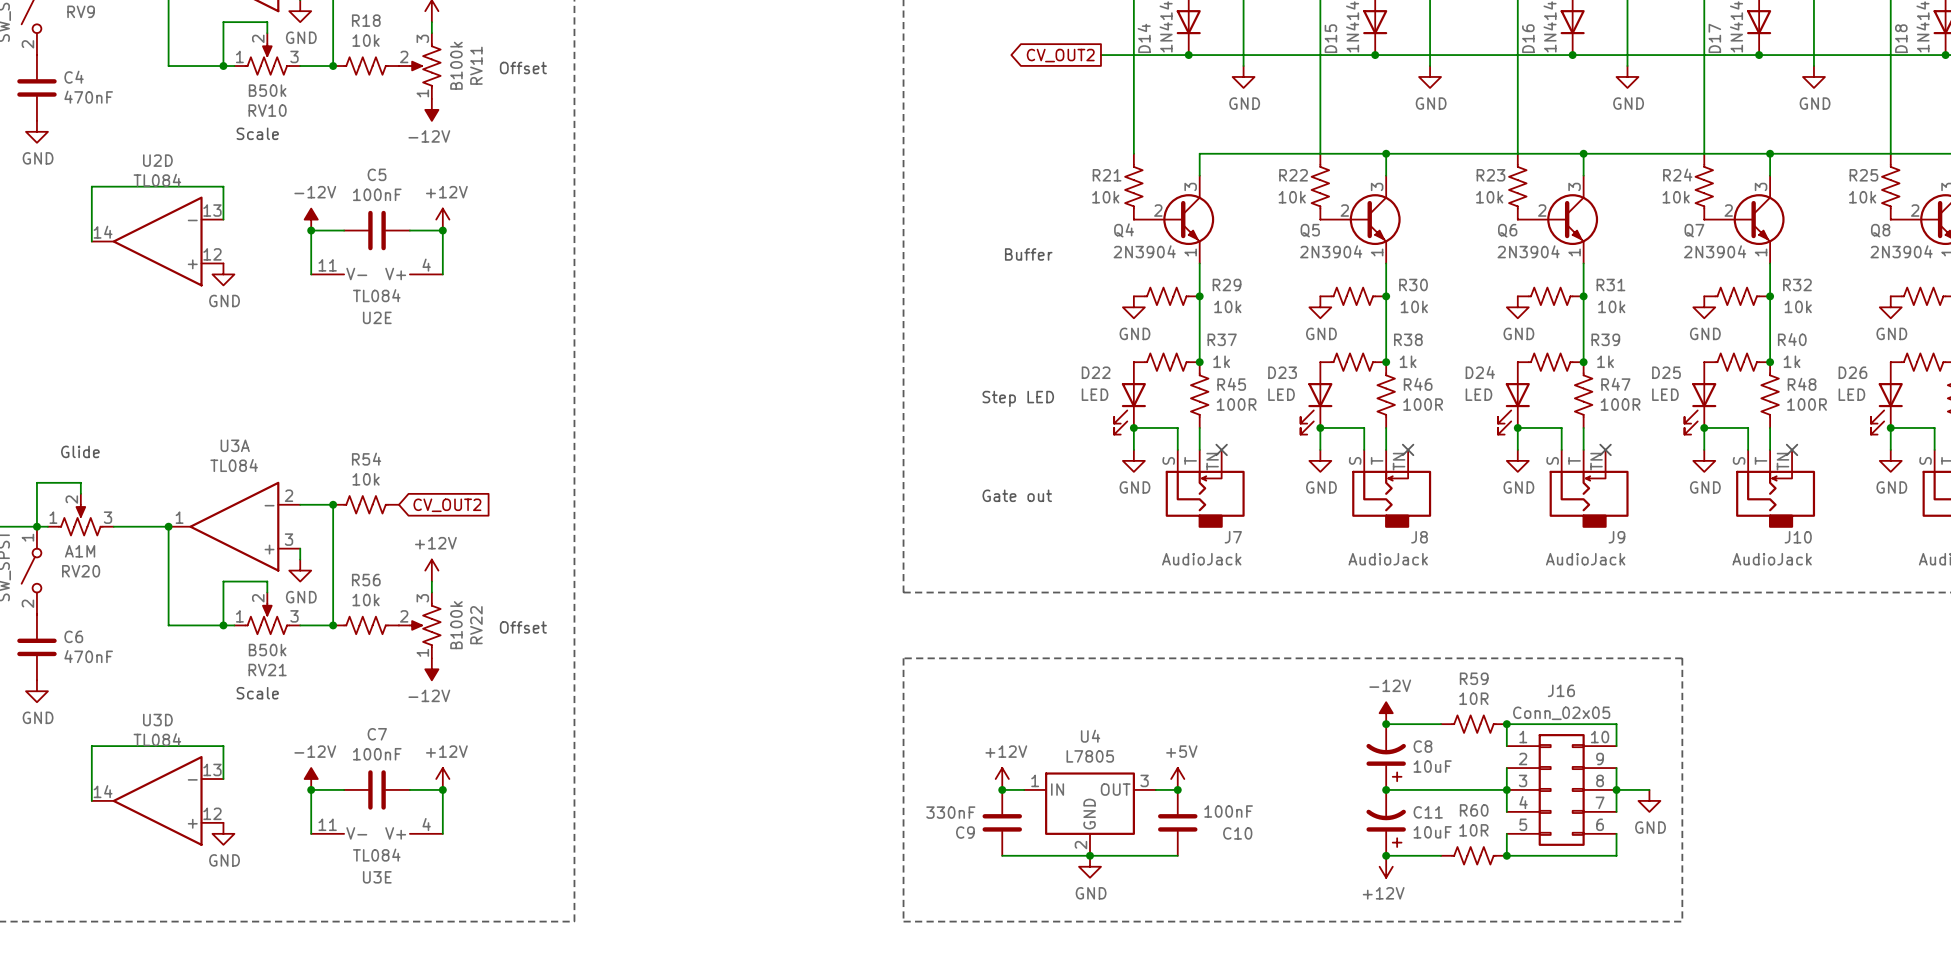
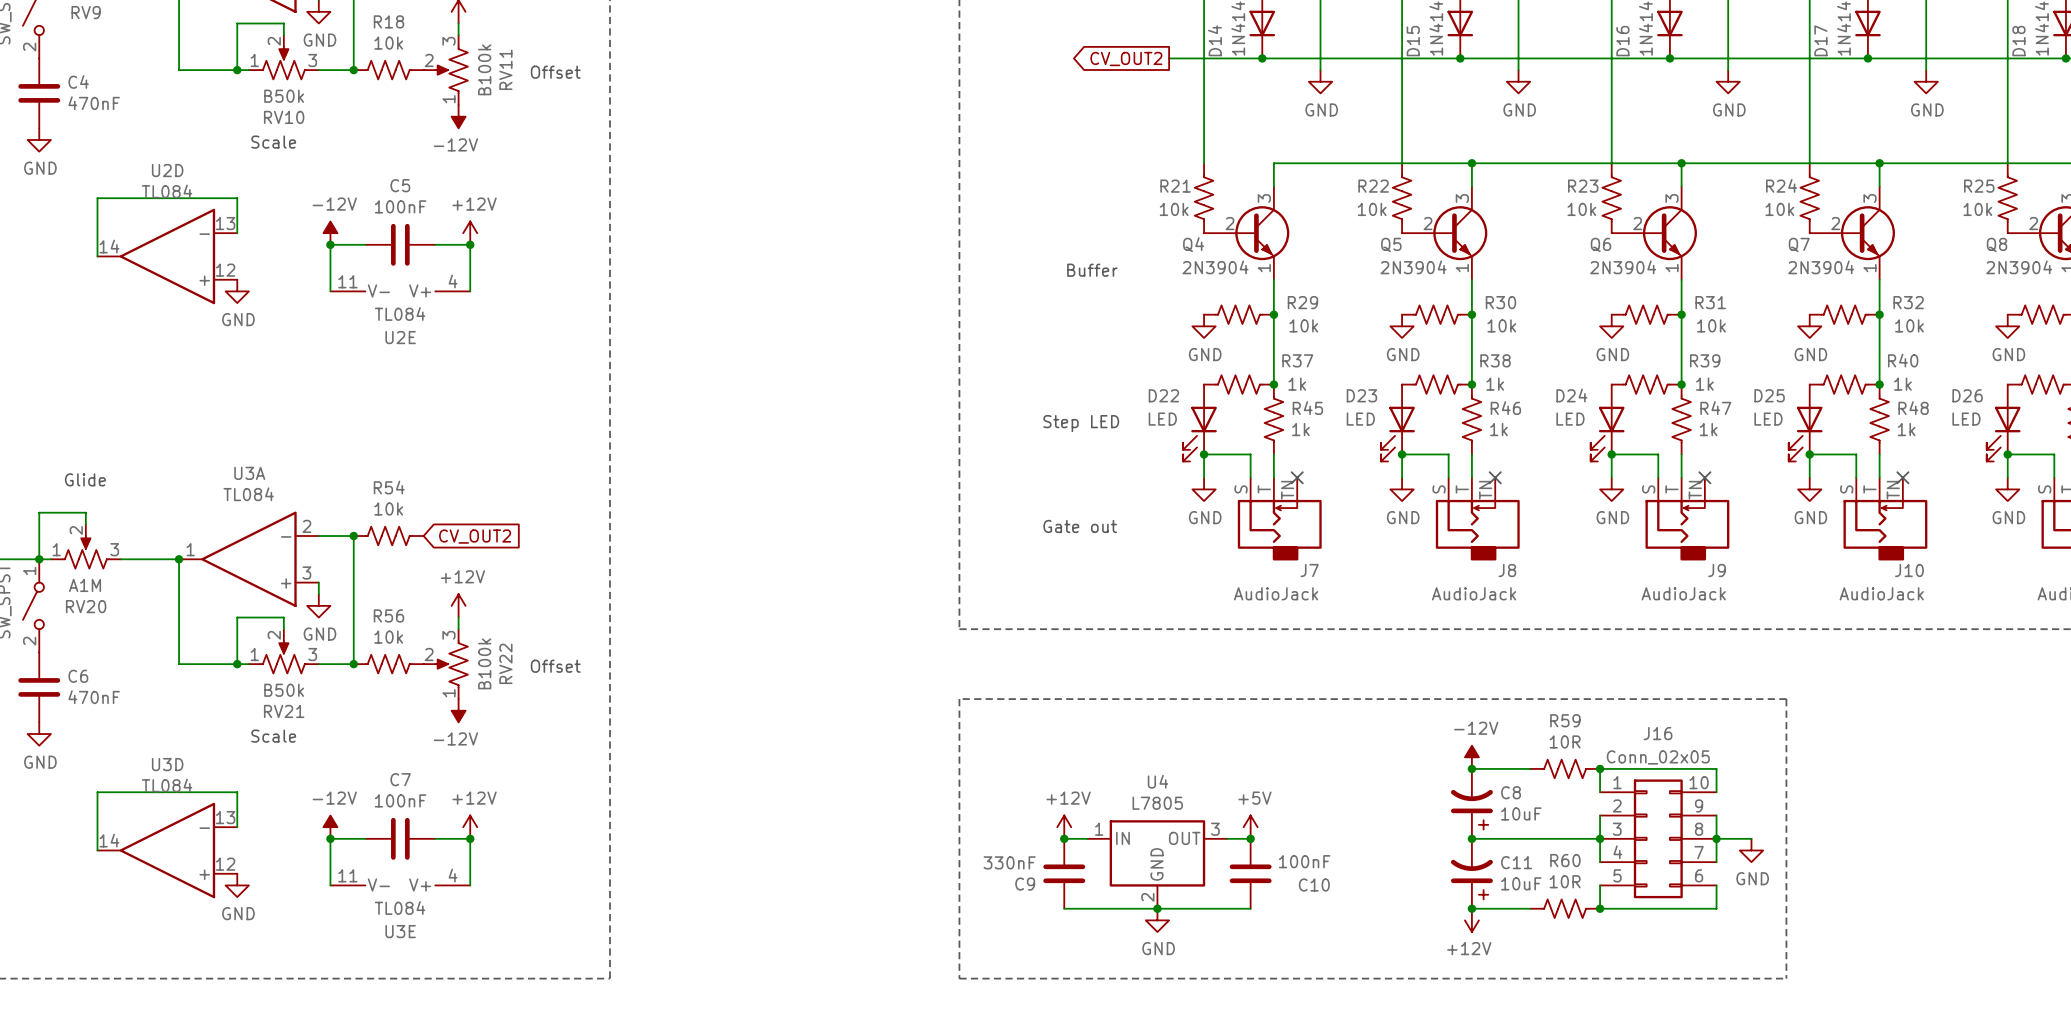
R45 value: 100R (1236, 404) -> 1k (1300, 429)
R46 value: 100R (1423, 404) -> 1k (1498, 429)
R47 value: 100R (1620, 404) -> 1k (1708, 429)
R48 value: 100R (1807, 404) -> 1k (1906, 429)

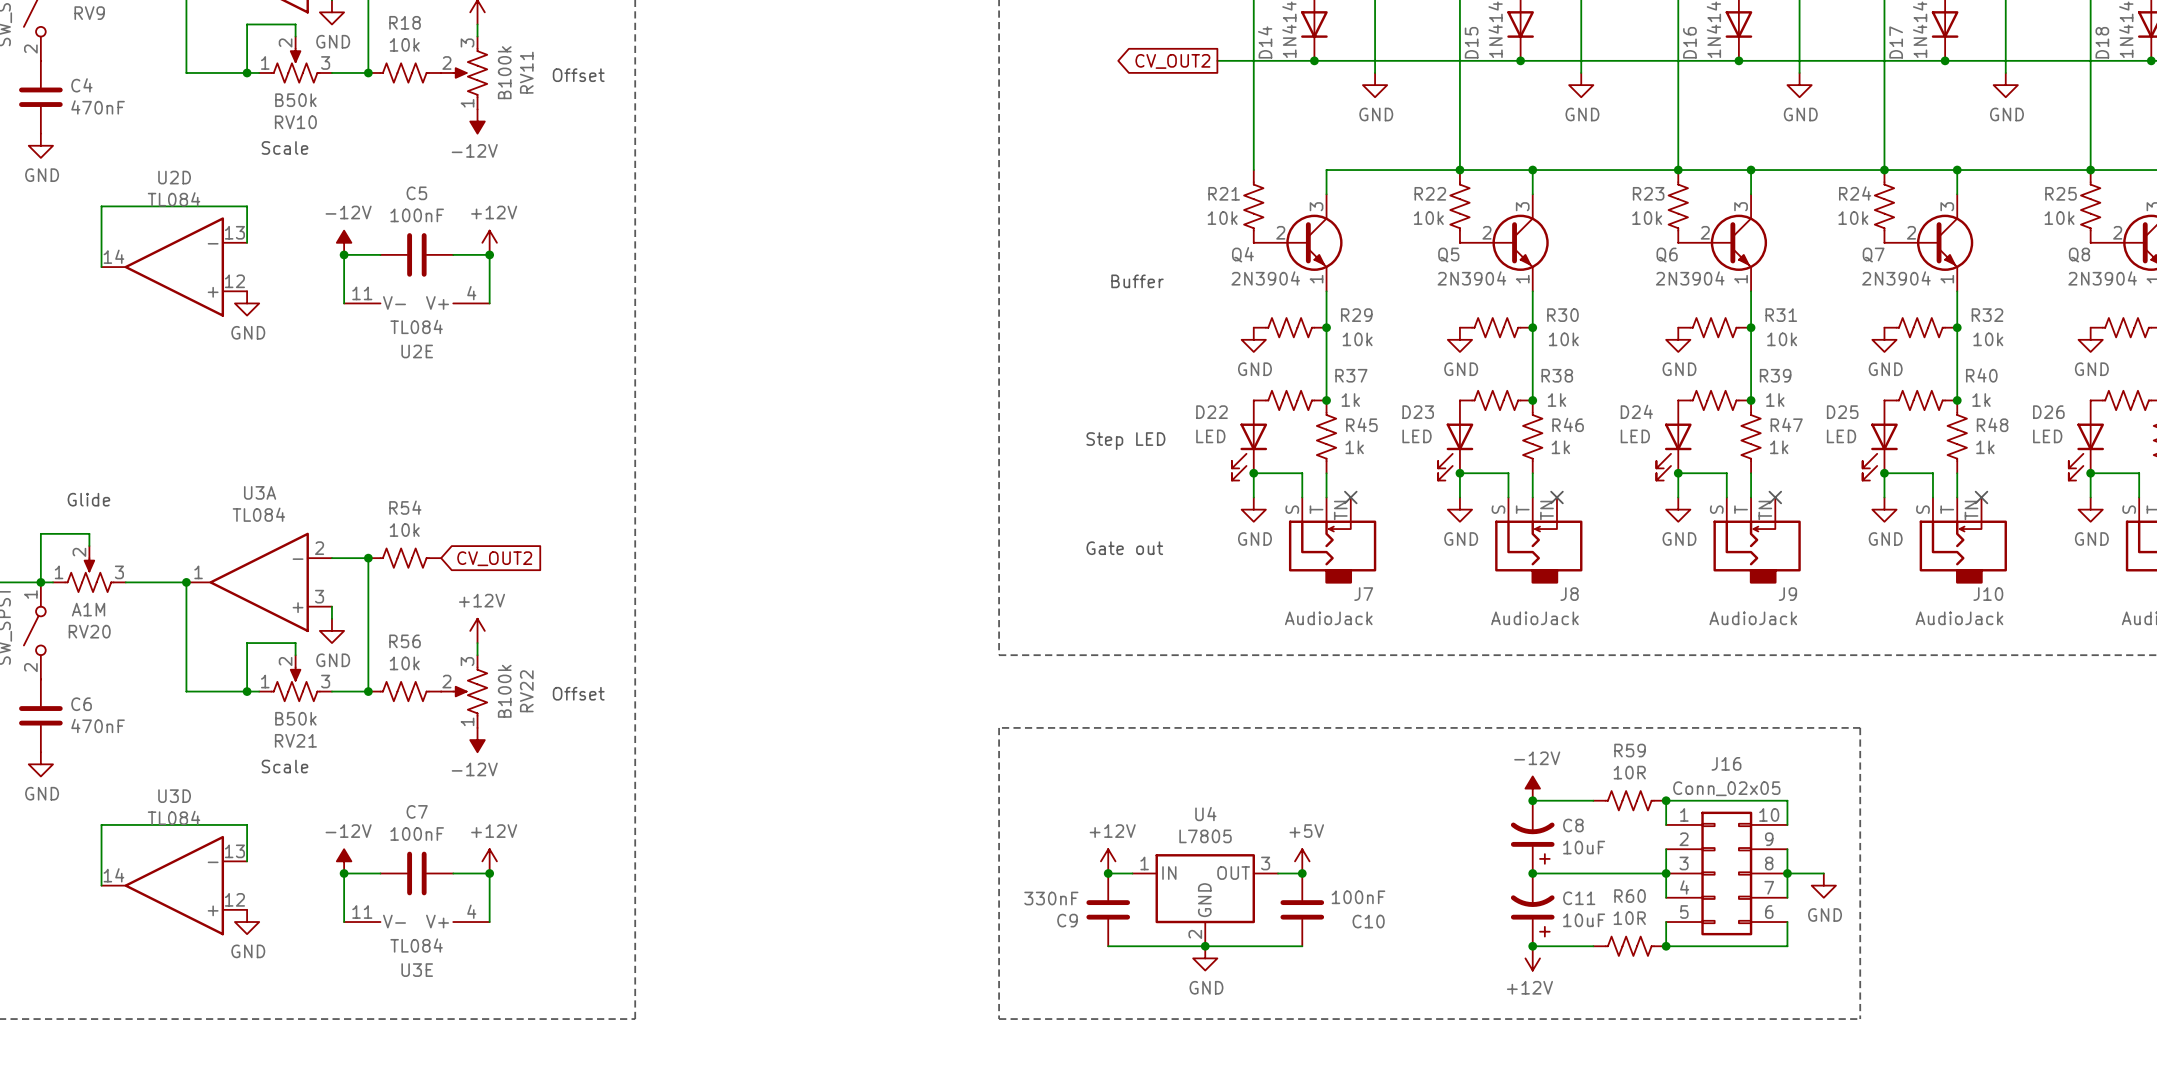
junction: none -> (1459, 170)
junction: none -> (1678, 170)
junction: none -> (1884, 170)
junction: none -> (2090, 170)

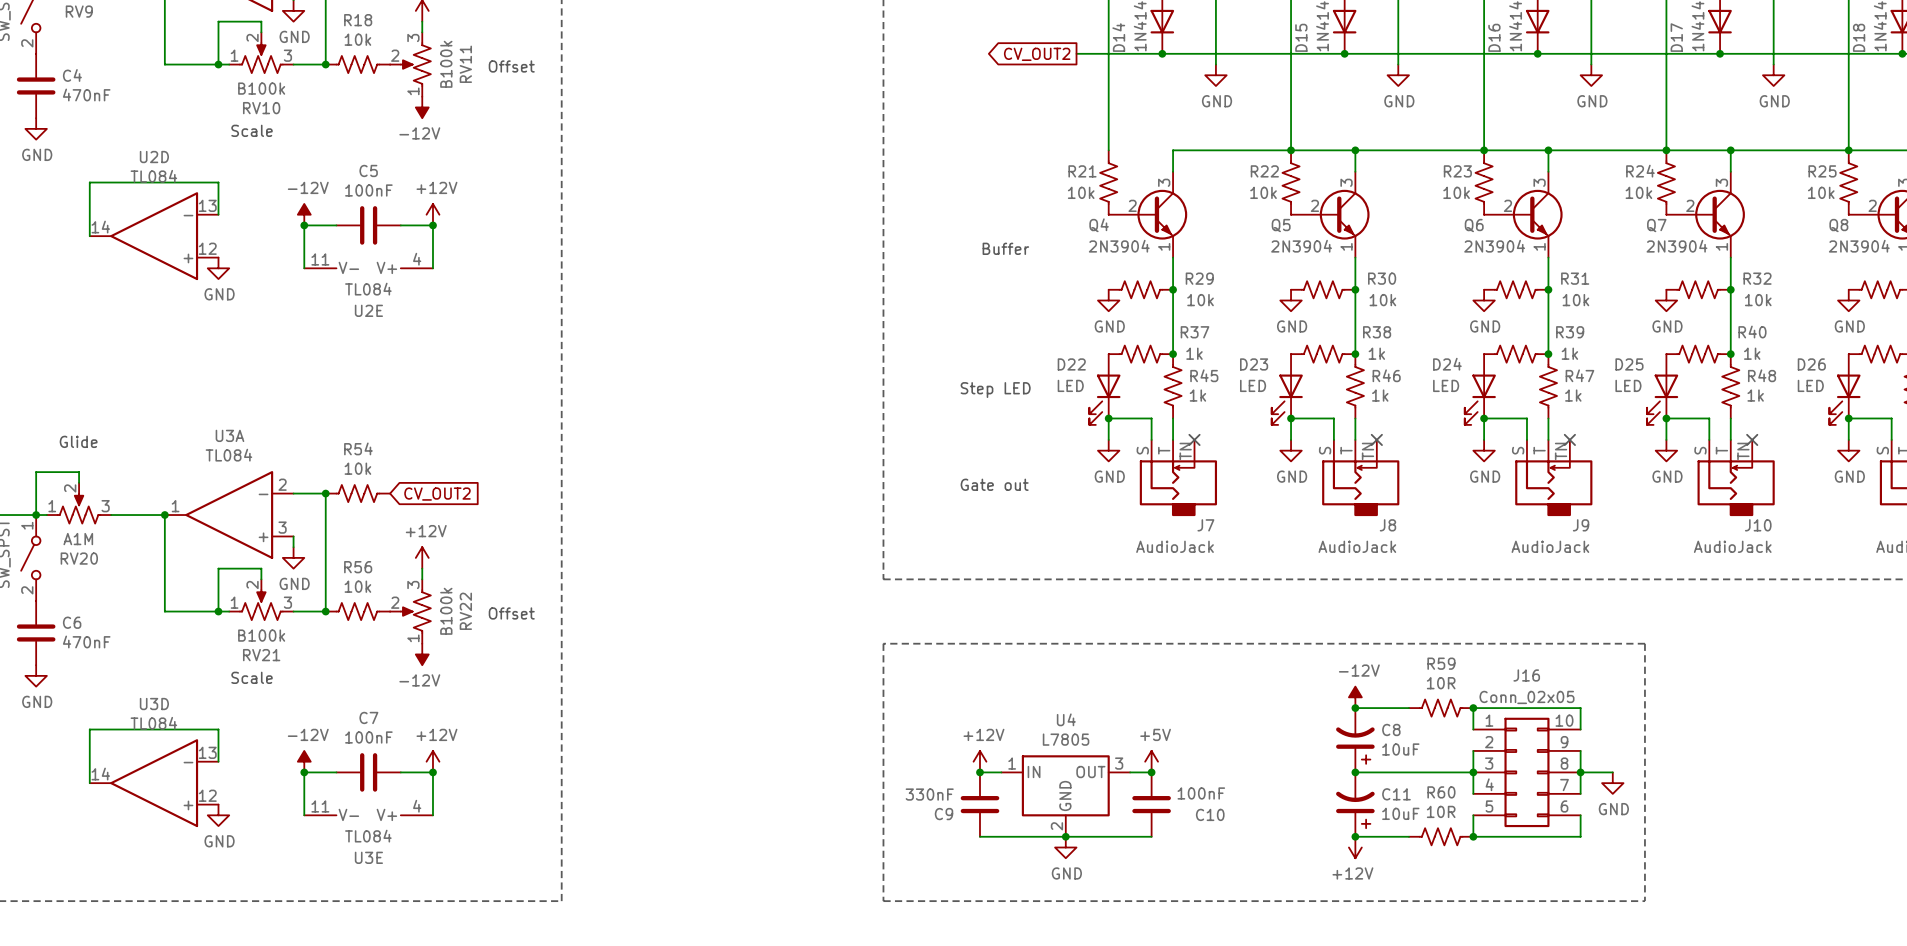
RV10 value: B50k (295, 100) -> B100k (261, 88)
RV21 value: B50k (295, 718) -> B100k (261, 635)

